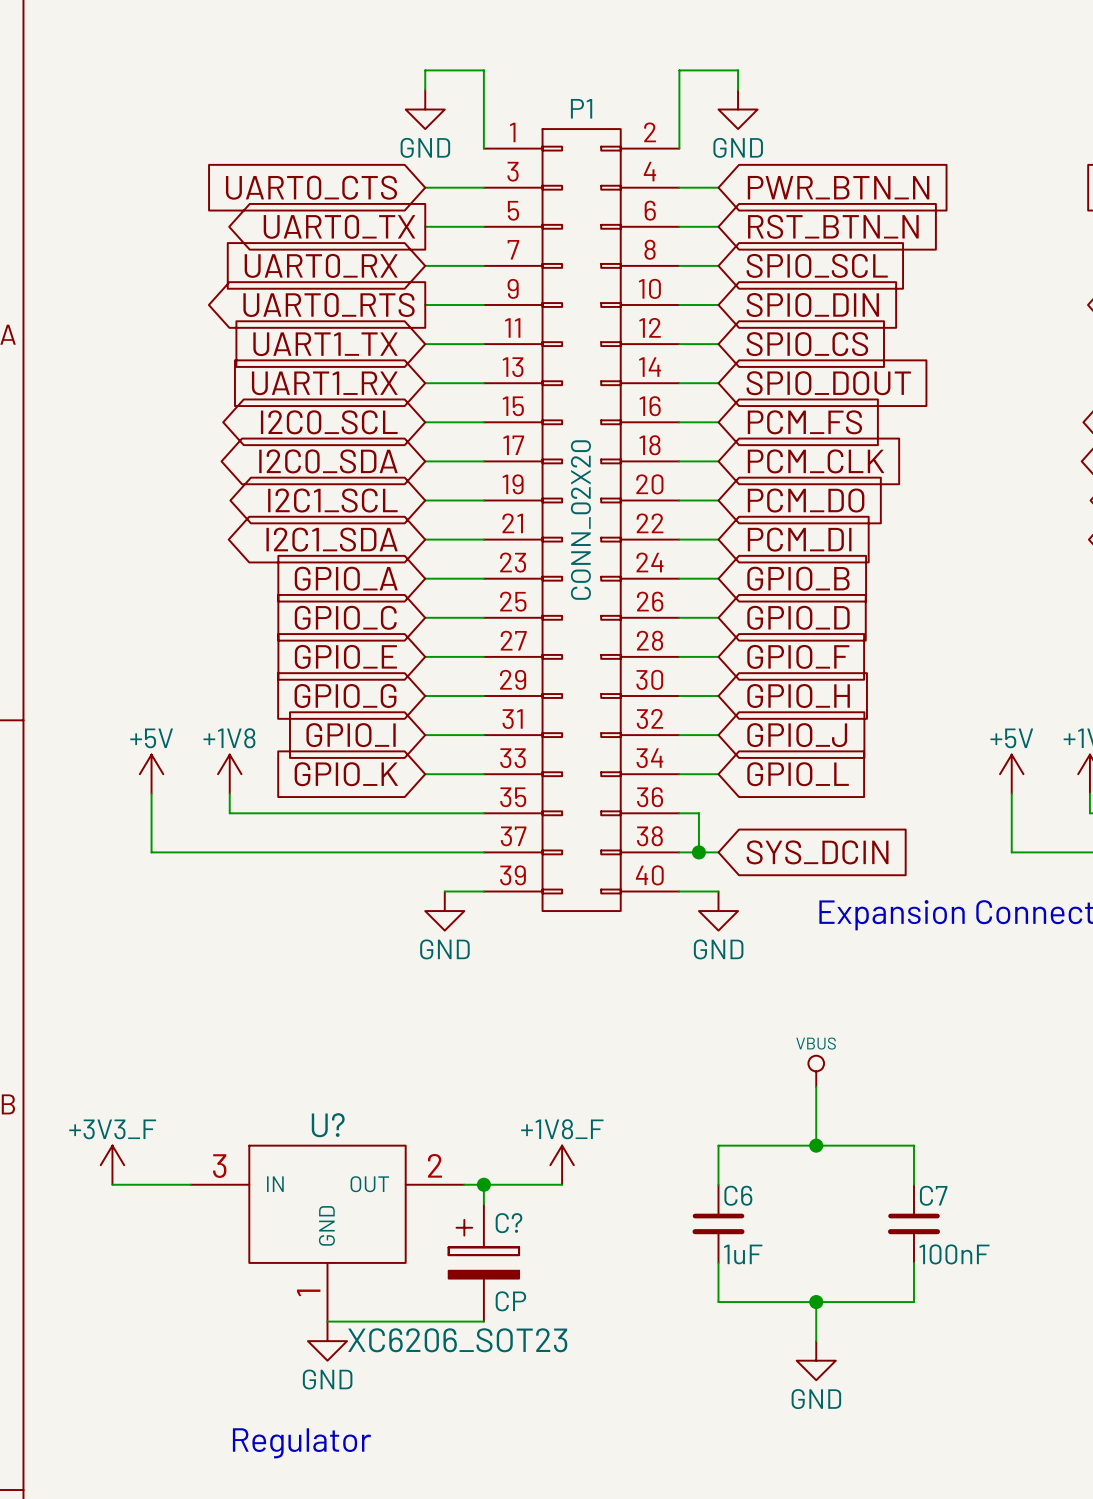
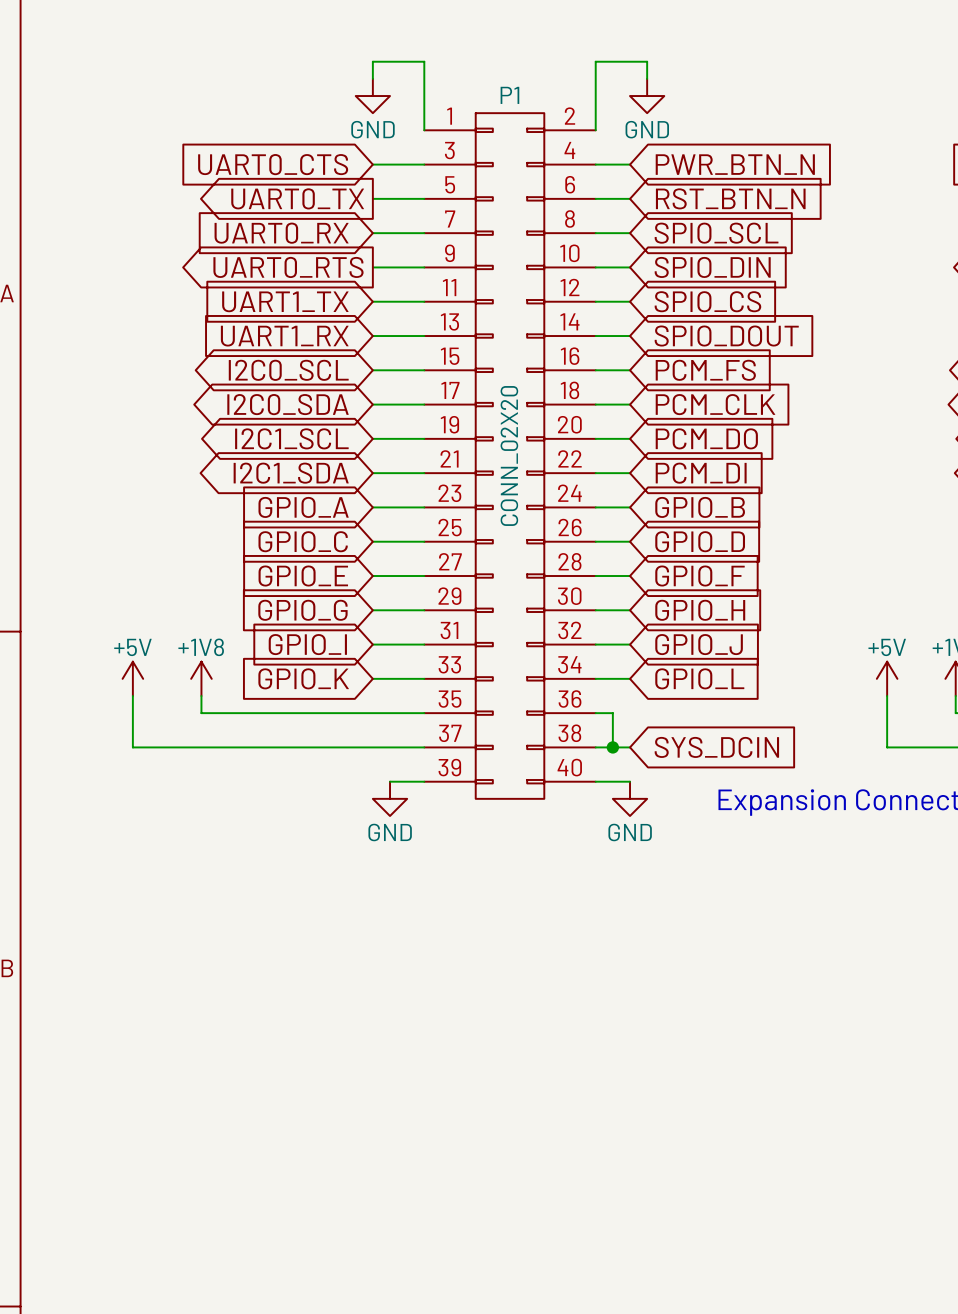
power symbol: VBUS (816, 1071) -> none
wire: (816, 1087) (816, 1145) -> none
junction: (816, 1145) -> none
power symbol: +3V3_F (112, 1165) -> none
power symbol: +1V8_F (562, 1165) -> none
wire: (112, 1184) (190, 1184) -> none
wire: (464, 1184) (562, 1184) -> none
wire: (483, 1184) (483, 1204) -> none
junction: (483, 1184) -> none
wire: (718, 1184) (718, 1145) (913, 1145) (913, 1184) -> none
C6: 1uF (718, 1223) -> none
C7: 100nF (913, 1223) -> none
U?: XC6206_SOT23 (327, 1233) -> none
C?: CP (483, 1262) -> none
wire: (718, 1262) (718, 1302) (913, 1302) (913, 1262) -> none
wire: (816, 1302) (816, 1341) -> none
junction: (816, 1302) -> none
wire: (327, 1321) (483, 1321) -> none
power symbol: GND (327, 1341) -> none
power symbol: GND (816, 1360) -> none
text: Regulator (301, 1443) -> none

